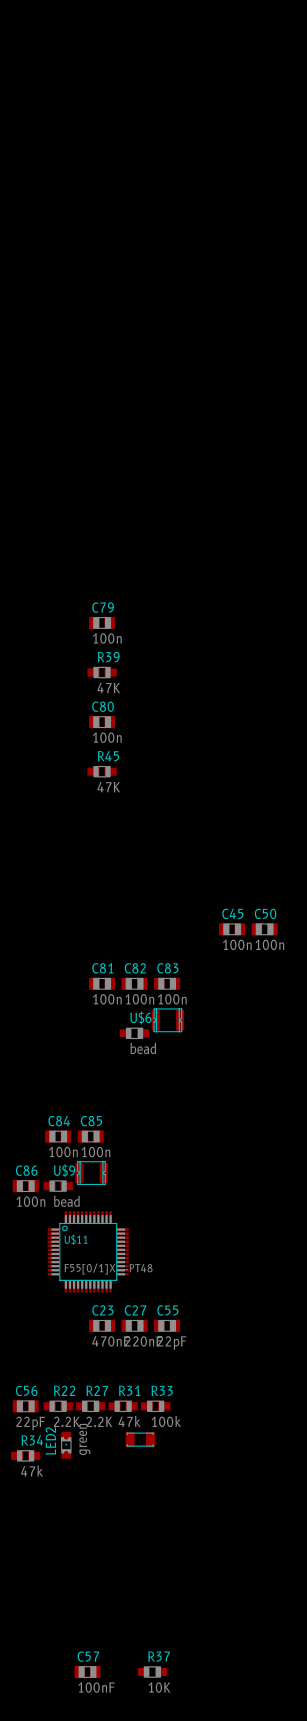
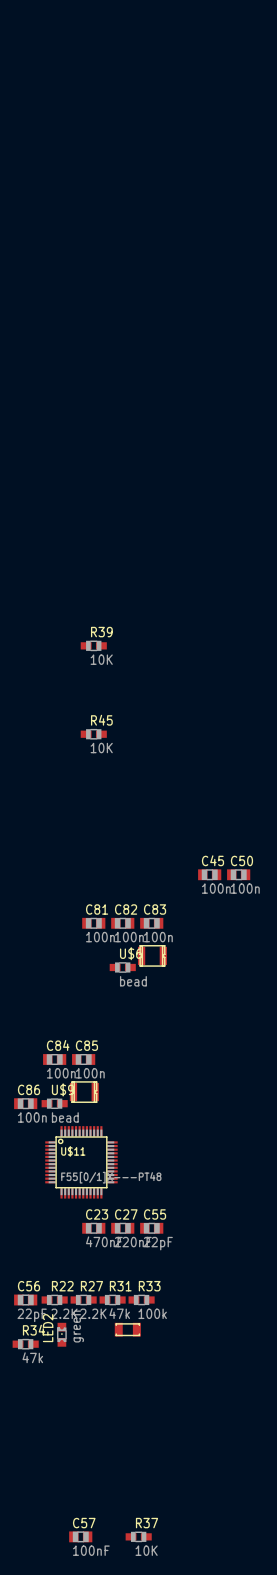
C79: 100n (102, 622) -> none
R39 value: 47K (108, 688) -> 10K (101, 659)
C80: 100n (102, 722) -> none
R45 value: 47K (108, 787) -> 10K (101, 748)

